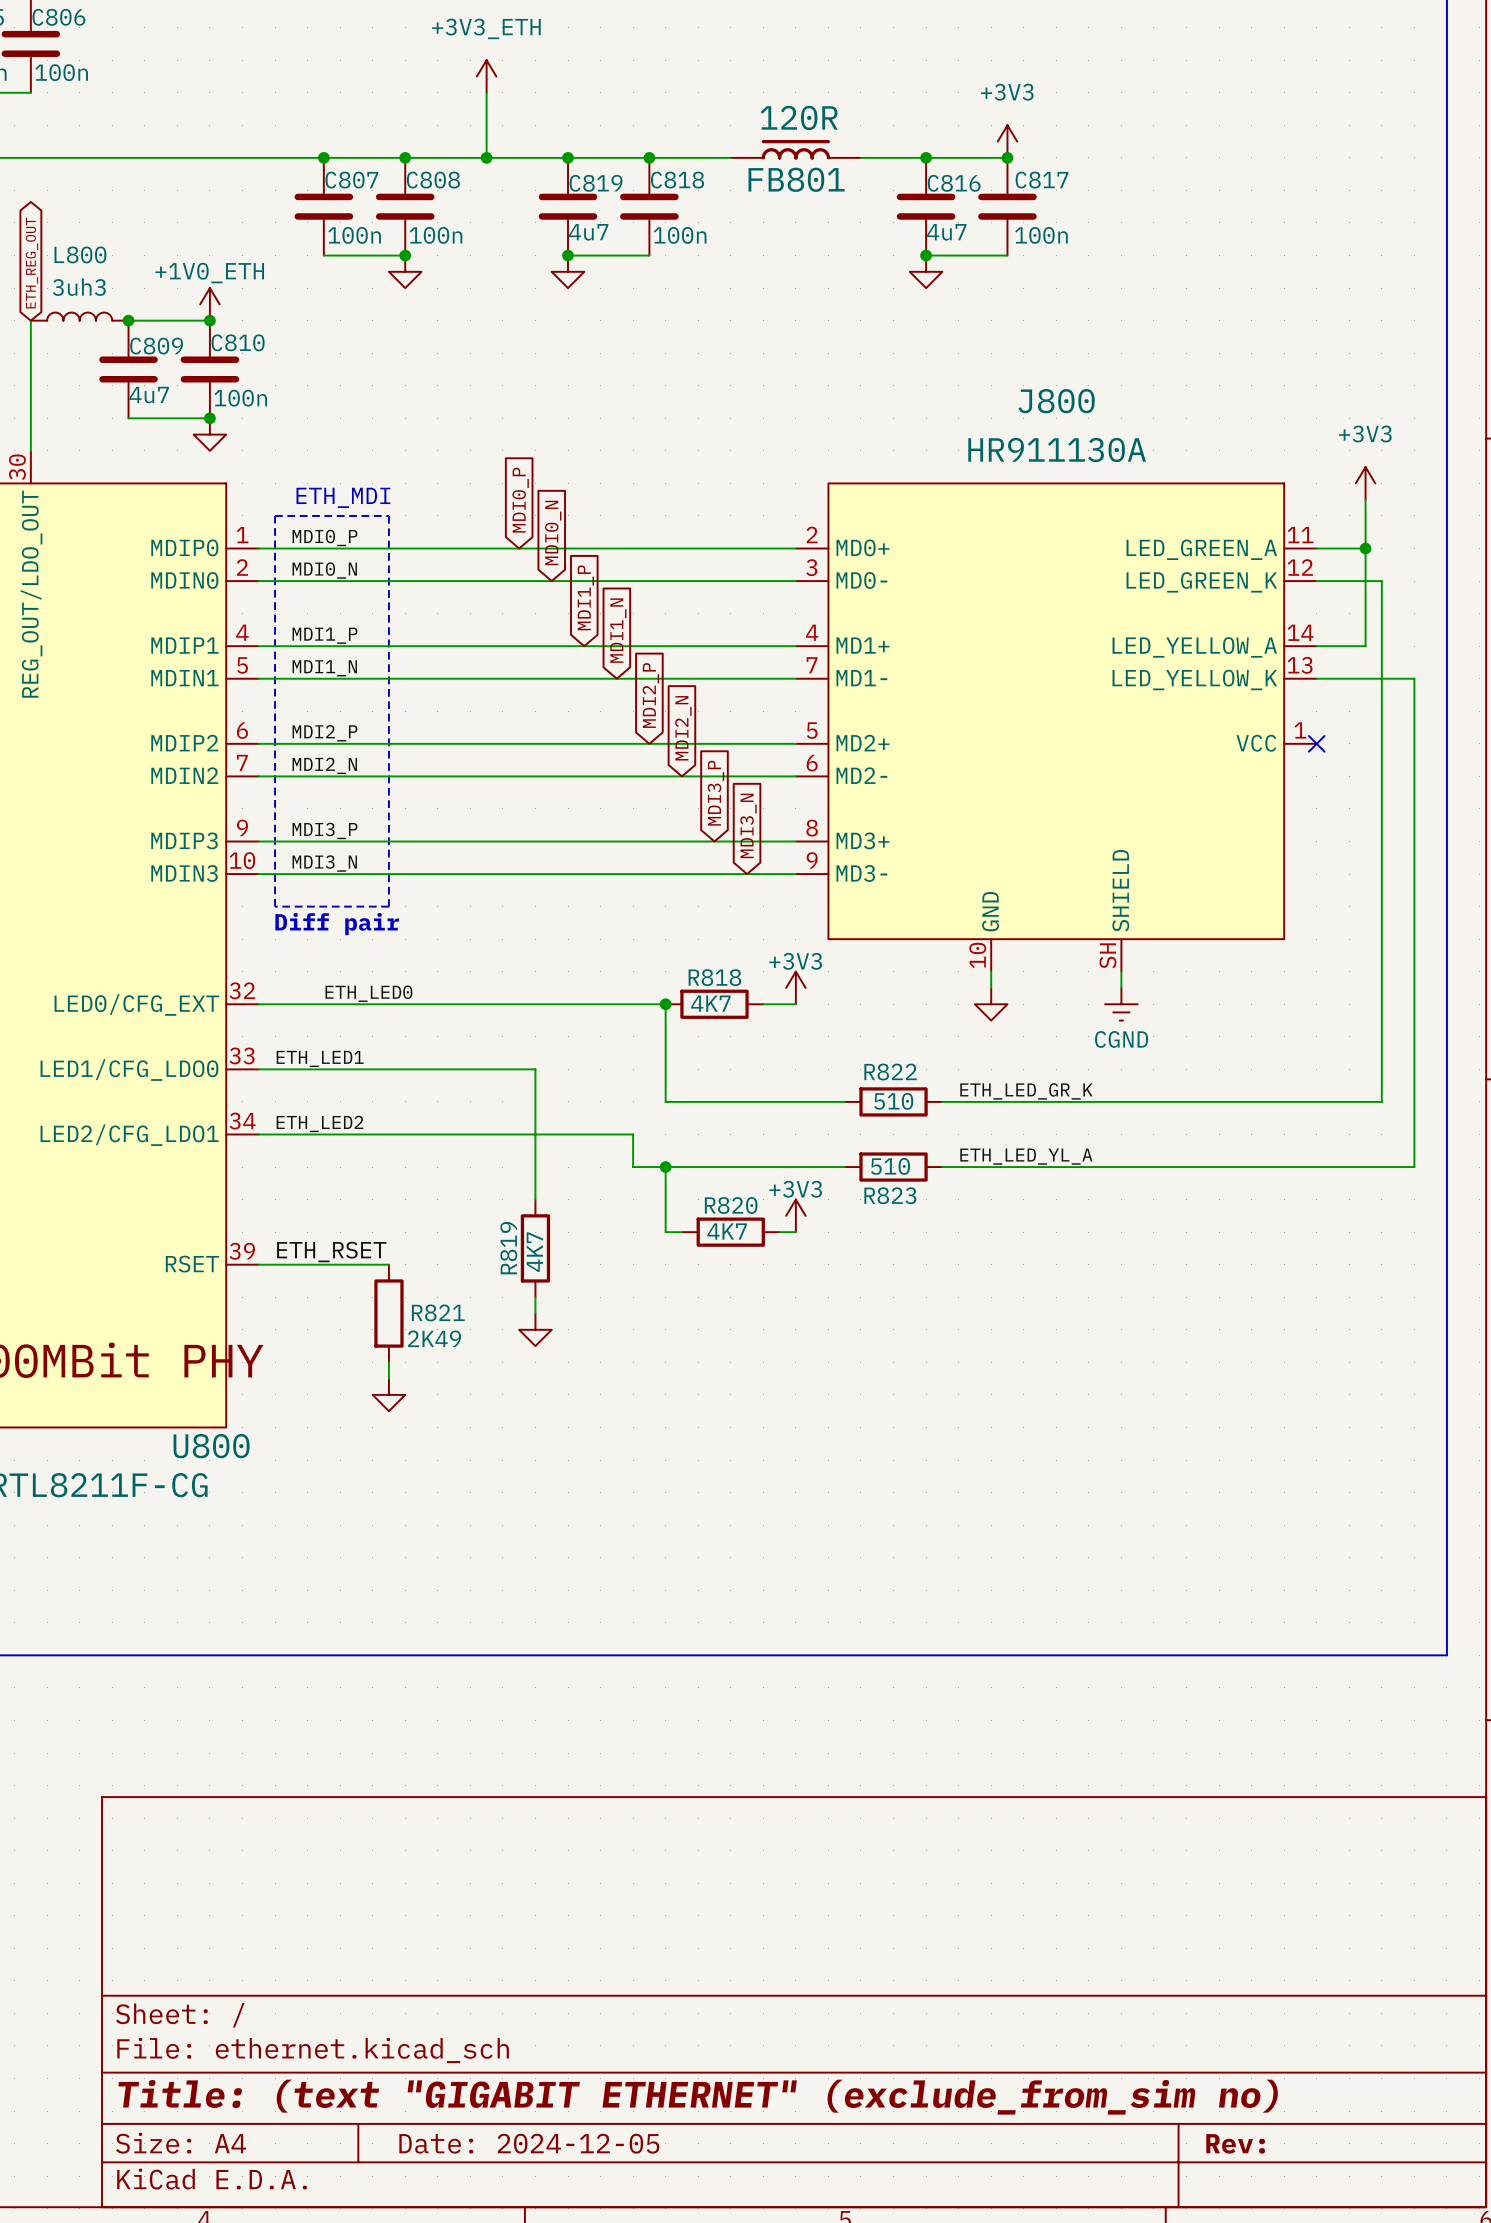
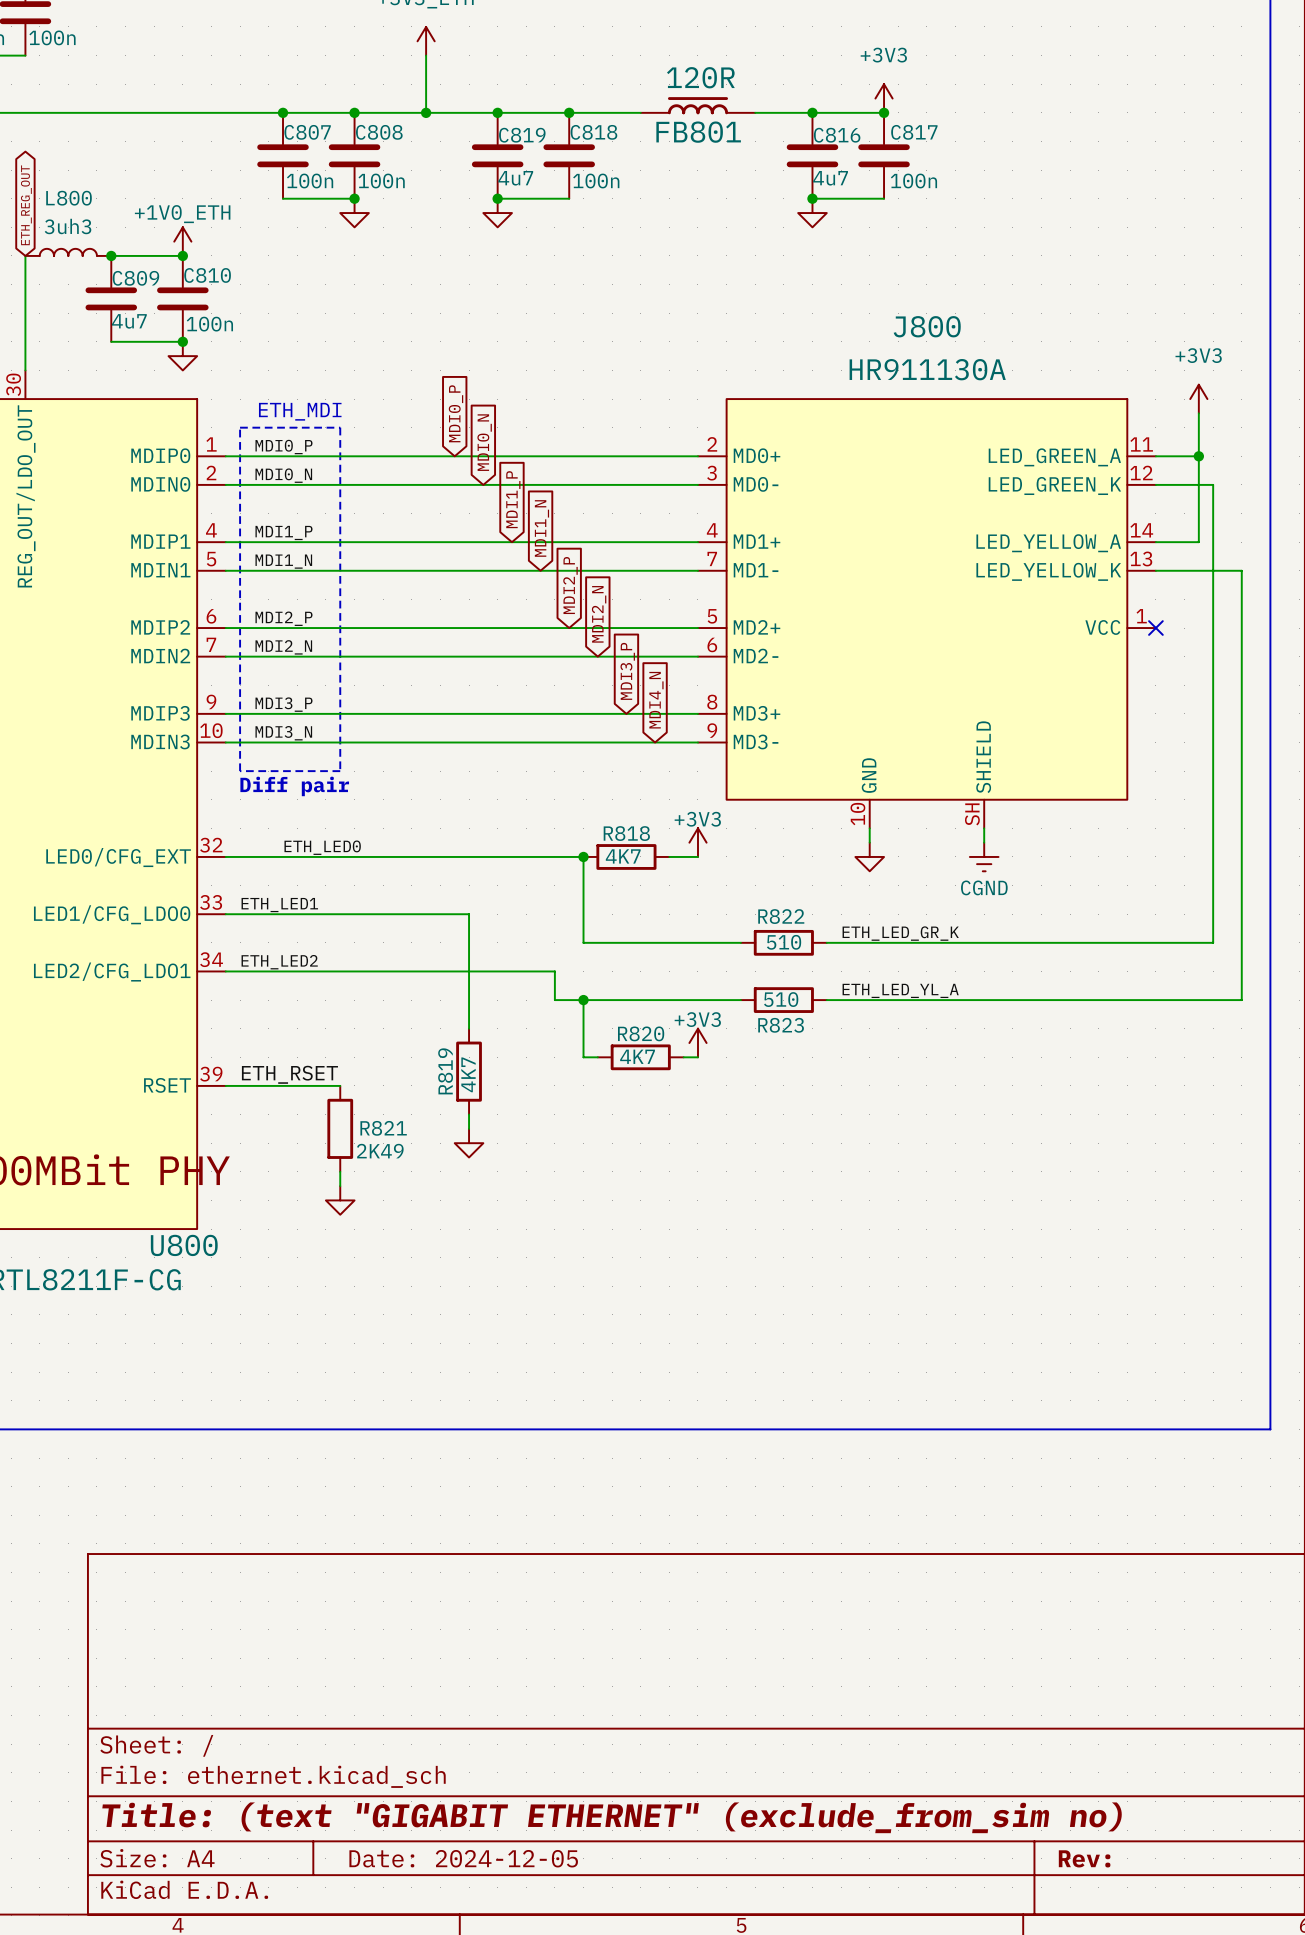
global label: MDI3_N (748, 825) -> MDI4_N (656, 700)

